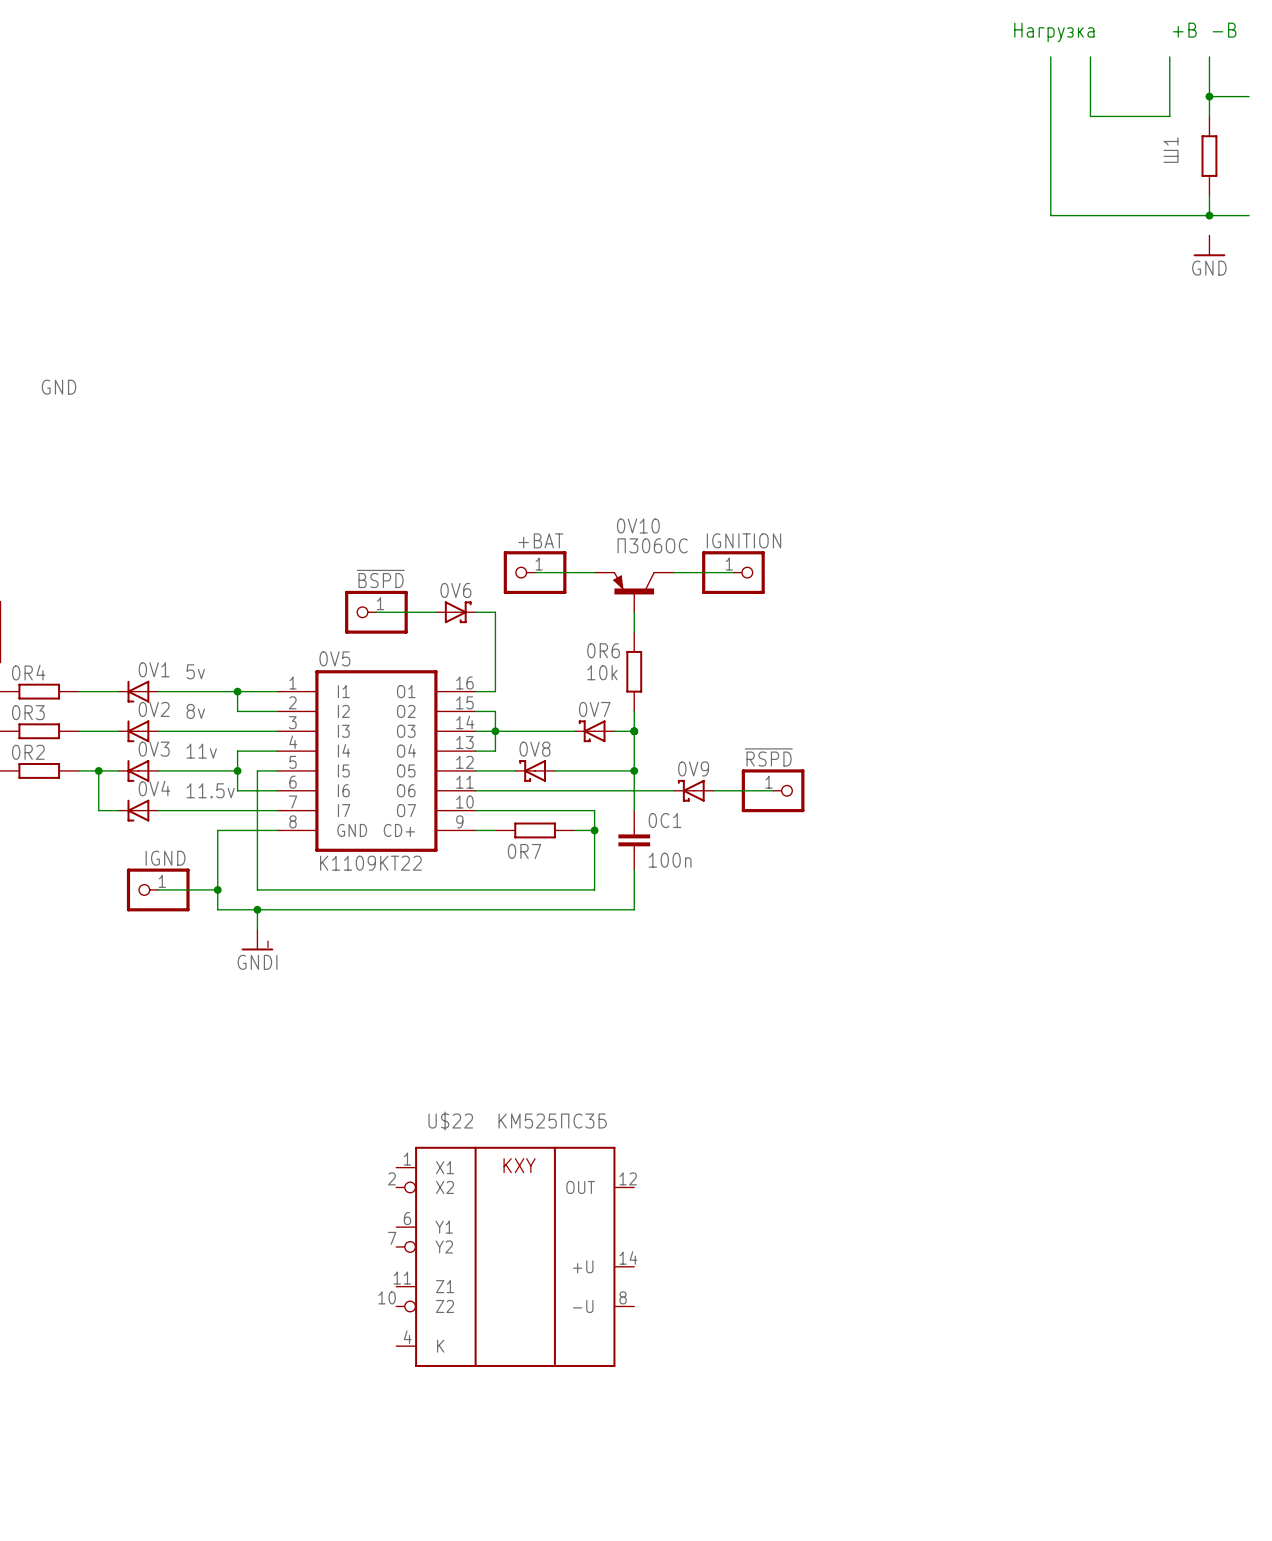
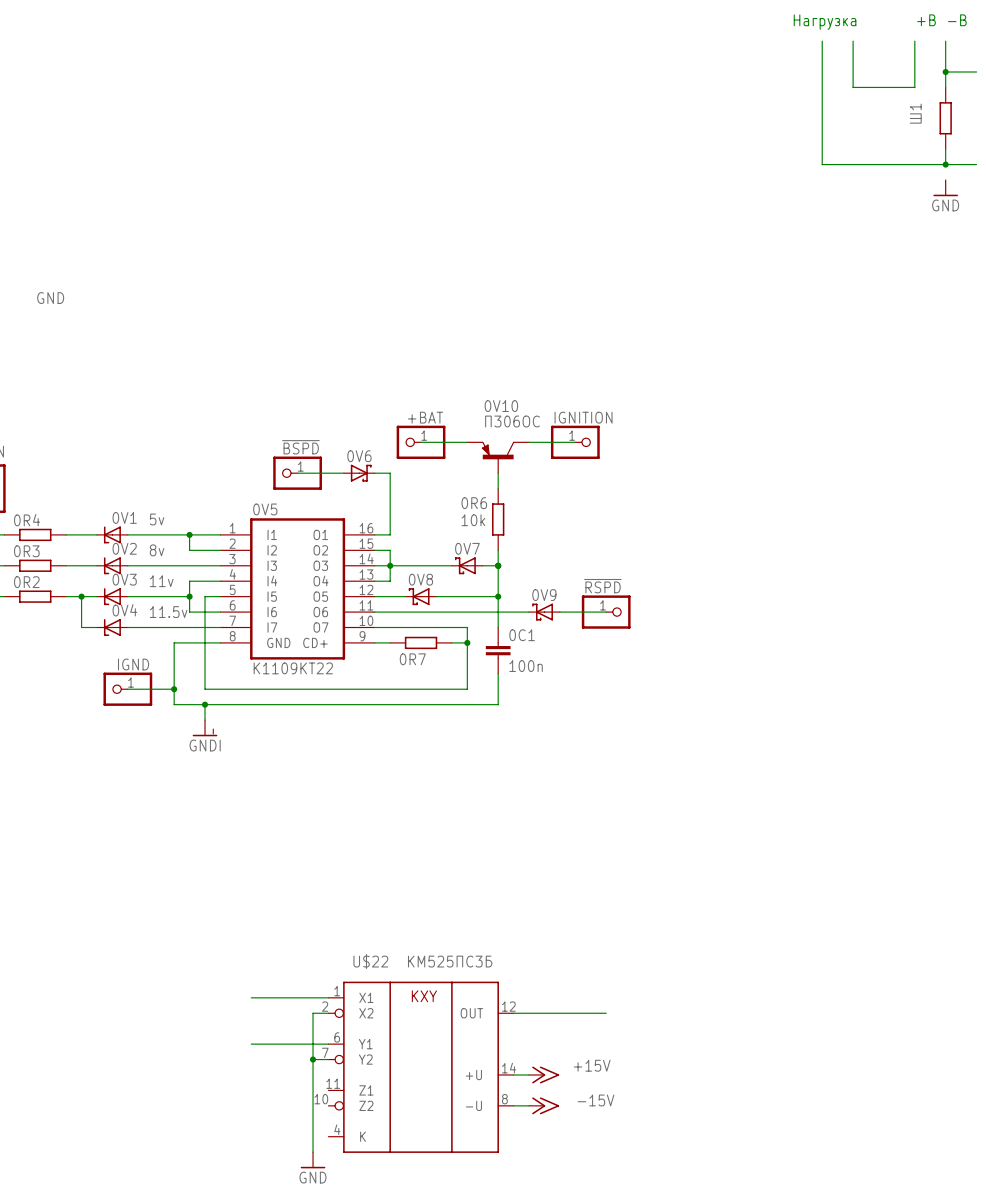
U$22 position: (515, 1256) -> (421, 1067)
wire: none -> (251, 997) (328, 997)
wire: none -> (328, 1013) (313, 1013) (313, 1152)
wire: none -> (513, 1013) (606, 1013)
wire: none -> (251, 1044) (328, 1044)
wire: none -> (313, 1059) (328, 1059)
junction: none -> (313, 1059)
wire: none -> (513, 1074) (529, 1074)
power symbol: none -> +15V (544, 1074)
wire: none -> (513, 1105) (529, 1105)
power symbol: none -> -15V (544, 1105)
power symbol: none -> GND (313, 1160)

